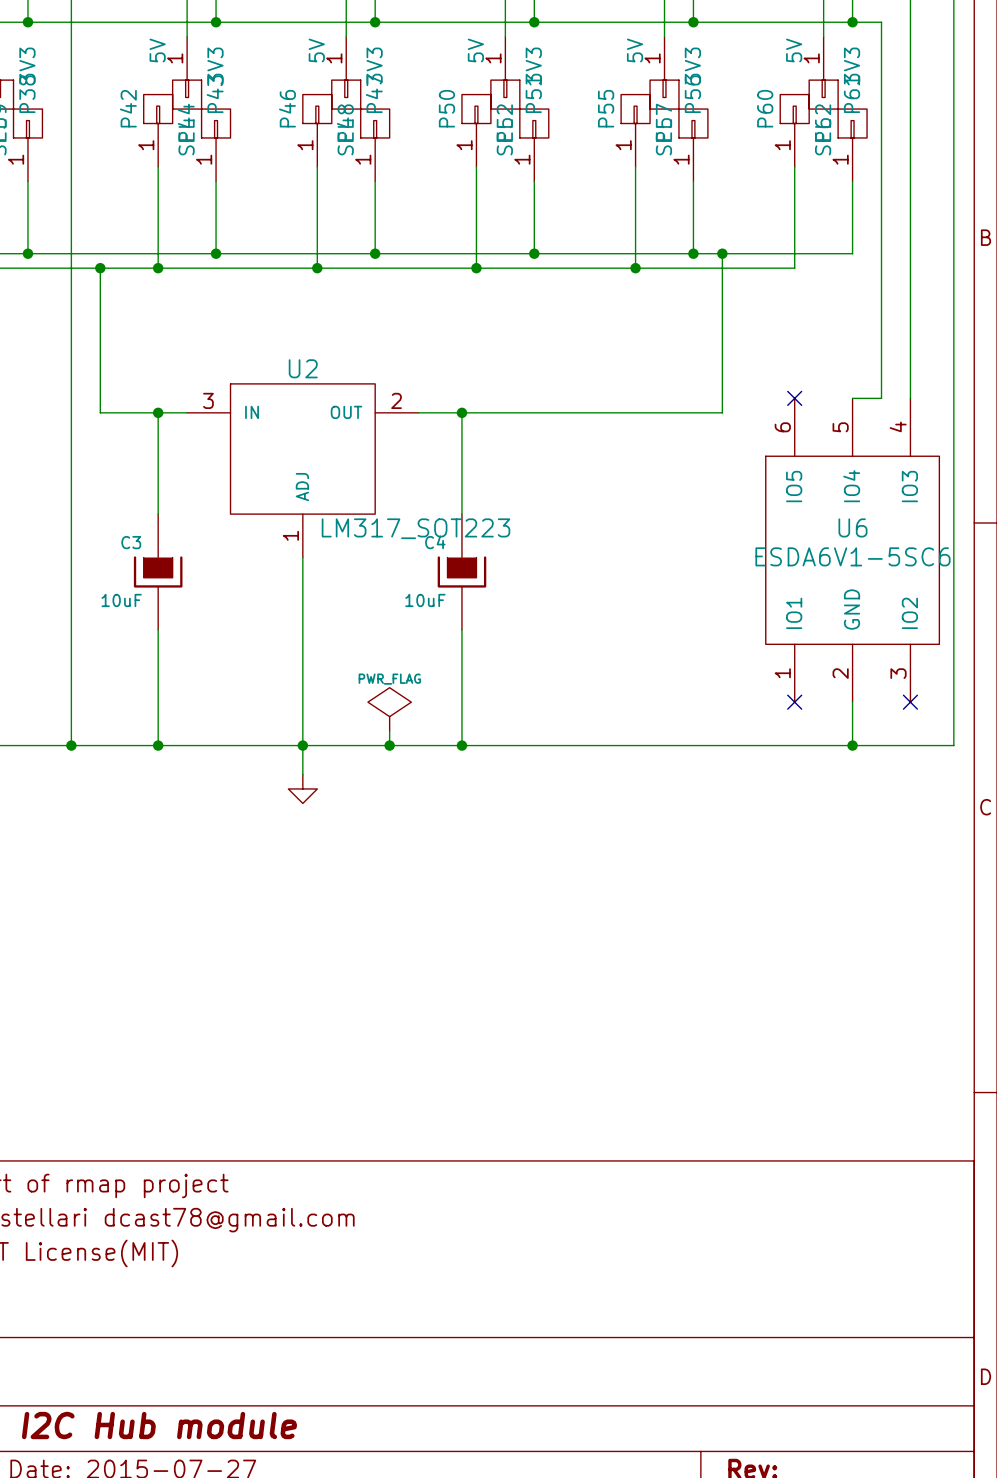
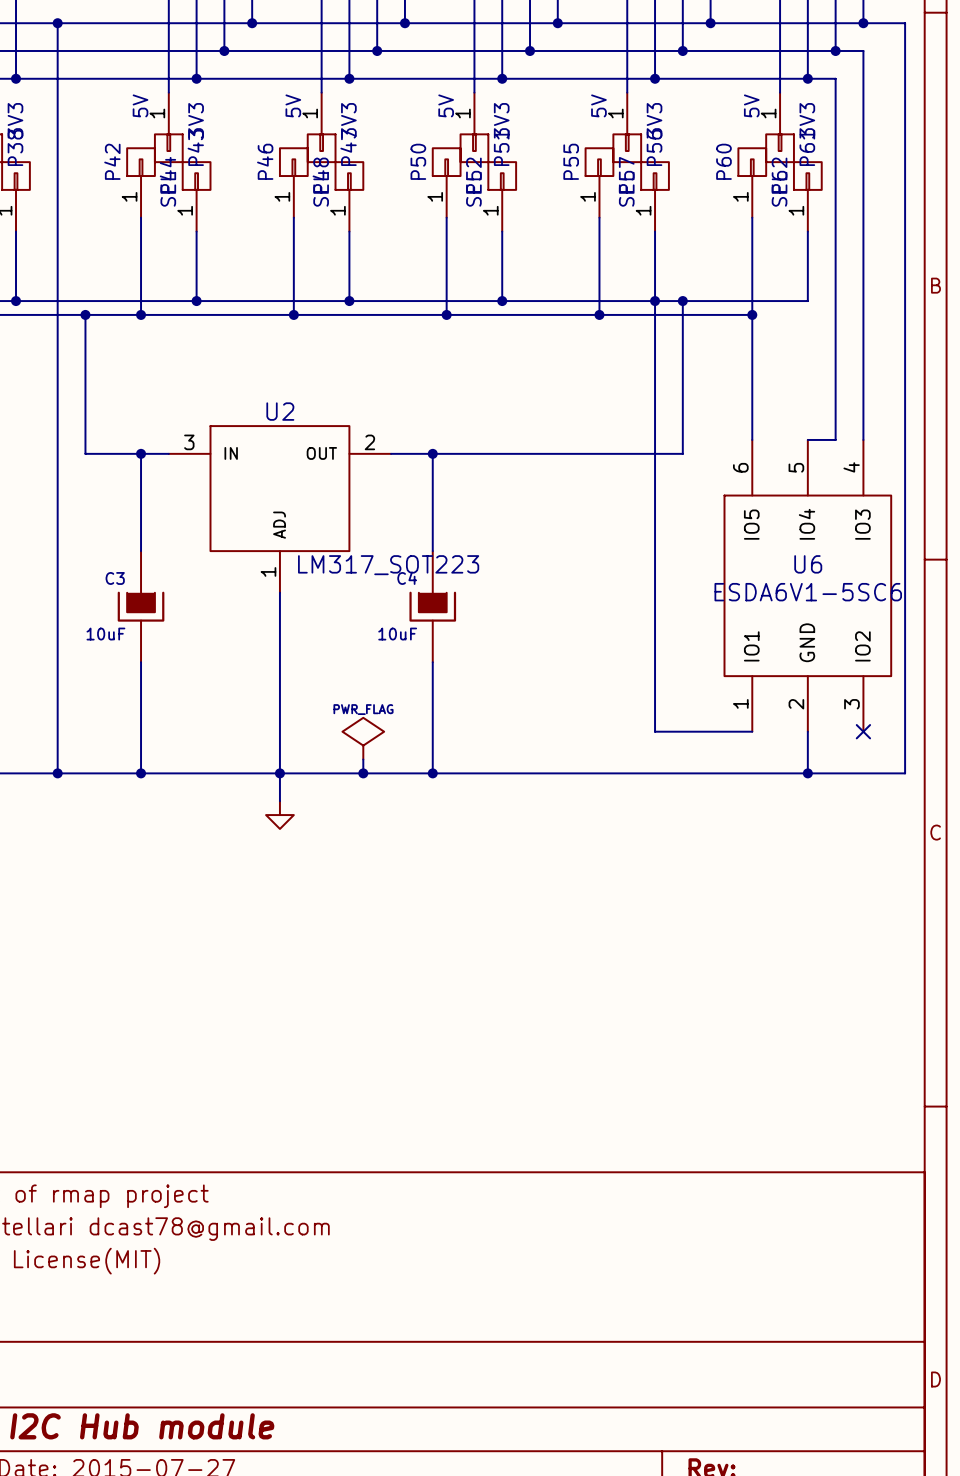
wire: none -> (655, 301) (655, 731) (752, 731)
wire: none -> (752, 314) (752, 439)
junction: none -> (752, 314)
no-connect mark: (794, 398) -> none
no-connect mark: (794, 702) -> none

